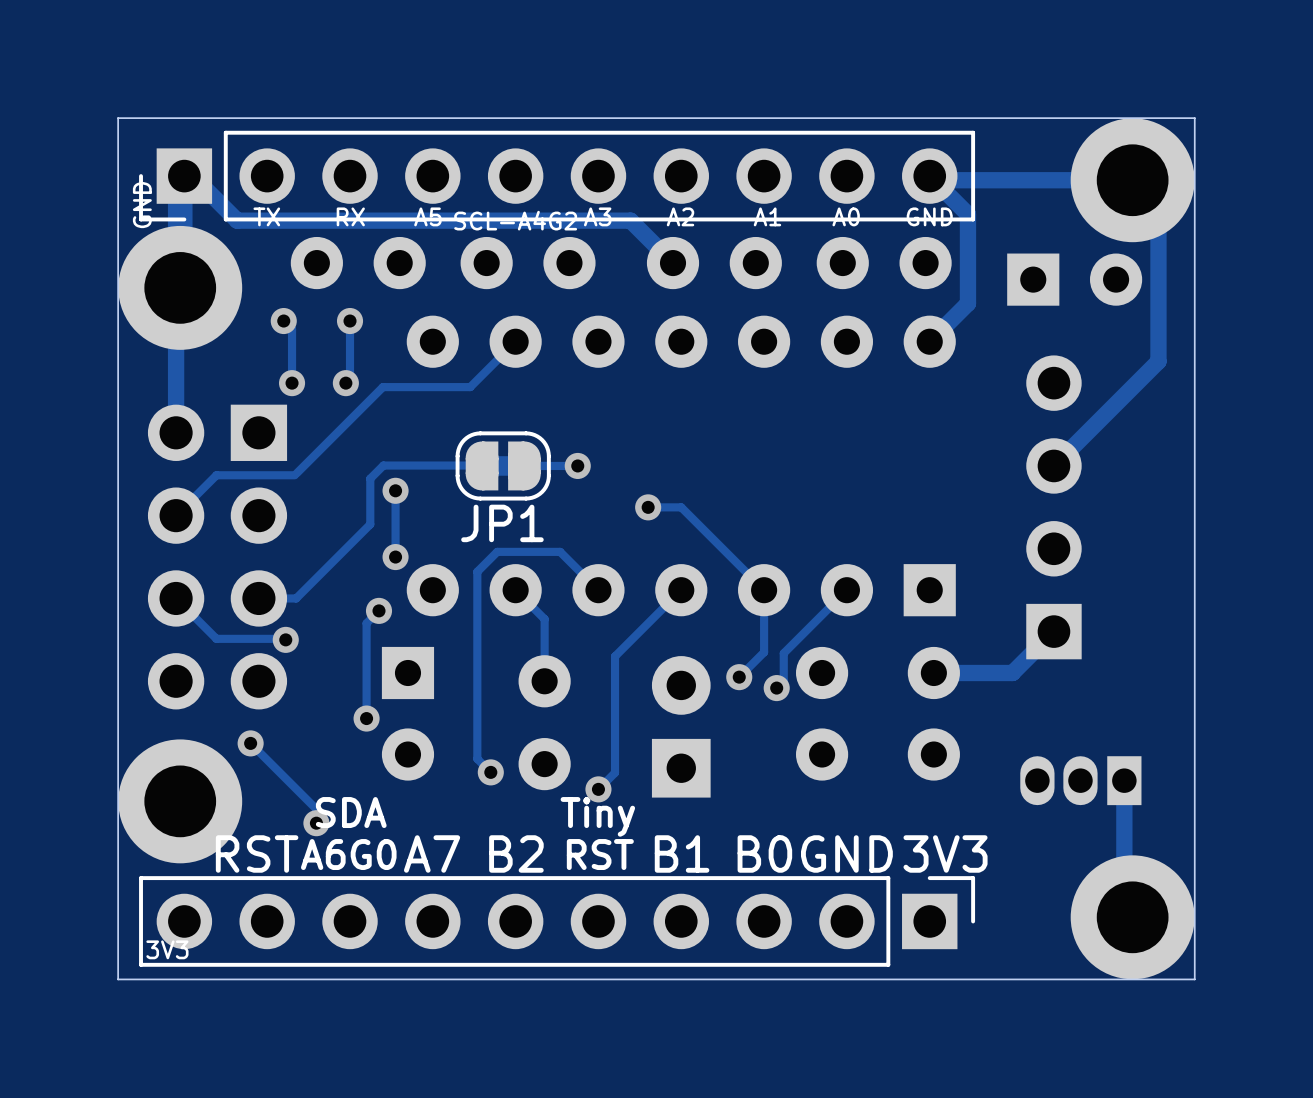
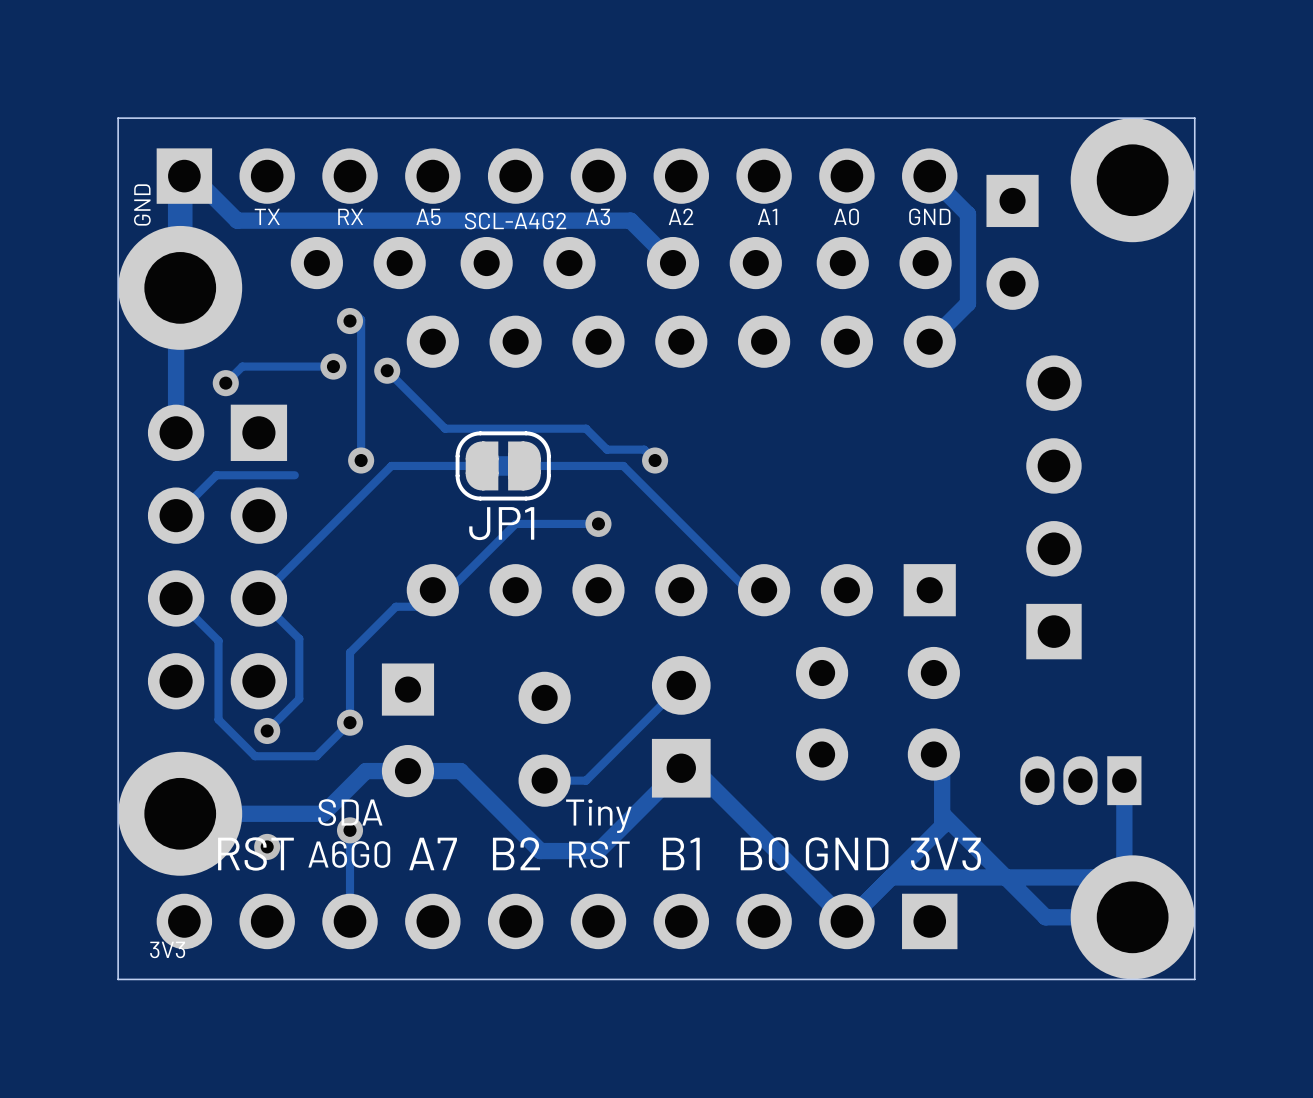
part footprint: [139, 130, 976, 222] -> [156, 148, 958, 204]
track: (933, 180) (1132, 180) (1158, 206) (1158, 361) (1053, 465) -> none
part rotation: 0° (1074, 279) -> 90° clockwise (1012, 242)
track: none -> (358, 316) (361, 319) (361, 460)
track: (283, 321) (292, 329) (292, 383) -> none
via: (283, 321) -> none
track: (350, 321) (350, 387) -> none
track: (515, 341) (470, 387) (382, 387) (296, 473) -> none
track: none -> (333, 366) (242, 366) (225, 383)
track: none -> (387, 370) (445, 428) (586, 428) (607, 449) (644, 449) (655, 460)
via: none -> (387, 370)
via: none -> (225, 383)
via: (292, 383) -> none
via position: (345, 383) -> (333, 366)
via: none -> (361, 460)
via: none -> (655, 460)
track: (481, 465) (383, 465) (370, 478) (370, 524) (296, 598) (258, 598) (258, 590) -> (482, 465) (391, 465) (258, 598) (299, 638) (299, 698) (267, 730)
track: none -> (577, 465) (623, 465) (764, 606)
via: (577, 465) -> none
track: (395, 490) (395, 557) -> none
via: (395, 490) -> none
track: (648, 507) (681, 507) (764, 590) -> none
via: (648, 507) -> none
via: none -> (598, 523)
via: (395, 557) -> none
track: (515, 590) (544, 619) (544, 681) -> none
track: (598, 590) (560, 551) (497, 551) (477, 571) (477, 758) (490, 772) -> none
track: (681, 590) (615, 656) (615, 772) (598, 789) -> none
track: (764, 590) (764, 652) (739, 677) -> none
track: (846, 590) (783, 653) (783, 681) (776, 688) -> none
track: (379, 610) (366, 623) (366, 718) -> none
via: (379, 610) -> none
track: (1053, 631) (1012, 673) (933, 673) -> none
track: (216, 638) (285, 639) -> (216, 638) (218, 640) (218, 719) (255, 756) (316, 756) (350, 722) (350, 652) (395, 606) (432, 606) (515, 523) (598, 523)
via: (285, 639) -> none
via: (739, 677) -> none
track: none -> (681, 685) (586, 780) (544, 780)
via: (776, 688) -> none
part position: (407, 713) -> (407, 730)
via position: (366, 718) -> (350, 722)
part position: (544, 722) -> (544, 739)
track: (250, 743) (316, 809) (316, 823) (314, 822) -> none
via position: (250, 743) -> (267, 730)
track: none -> (933, 762) (942, 771) (942, 826) (846, 921) (693, 768) (681, 768) (598, 851) (540, 851) (460, 771) (365, 771) (323, 813) (180, 813)
via: (490, 772) -> none
via: (598, 789) -> none
part position: (180, 801) -> (180, 813)
track: none -> (942, 813) (1045, 917) (1132, 917)
via: (316, 823) -> none
track: none -> (350, 830) (350, 921)
via: none -> (350, 830)
via: none -> (267, 846)
part footprint: [139, 876, 976, 967] -> [156, 893, 958, 950]
track: none -> (890, 877) (1092, 877) (1124, 909)

